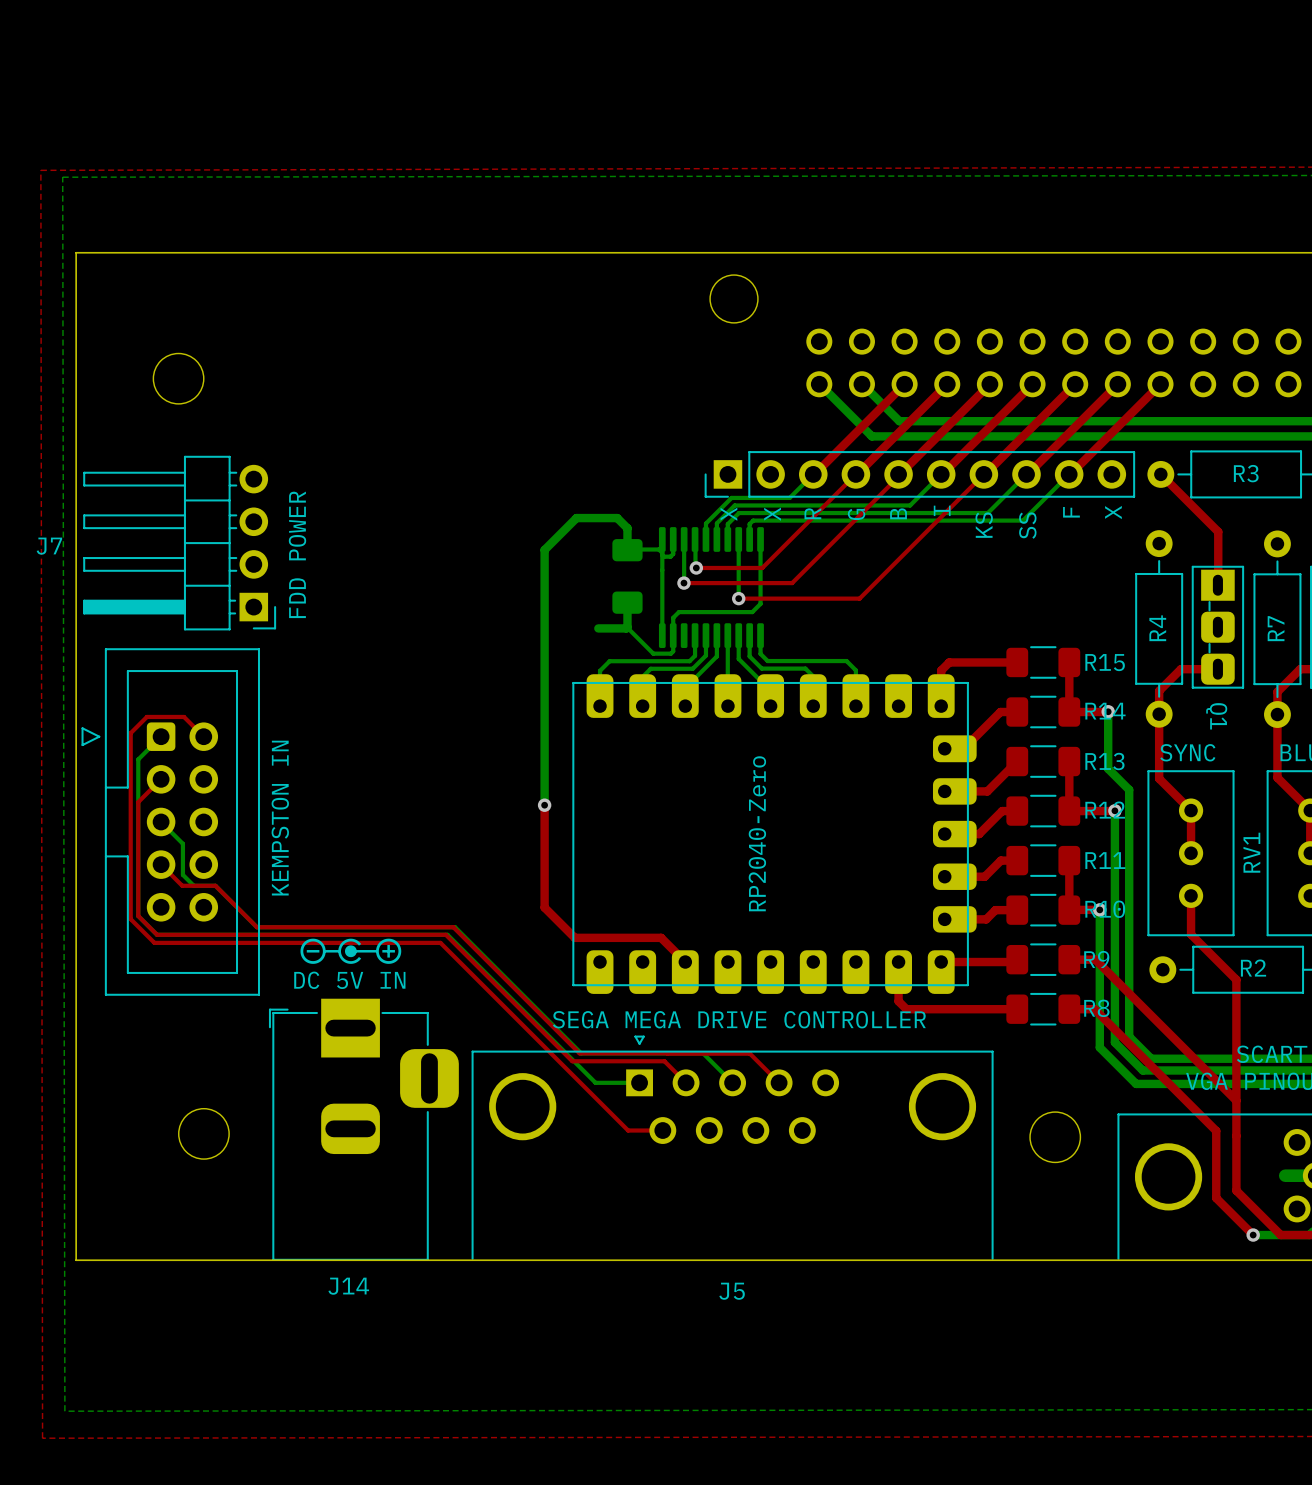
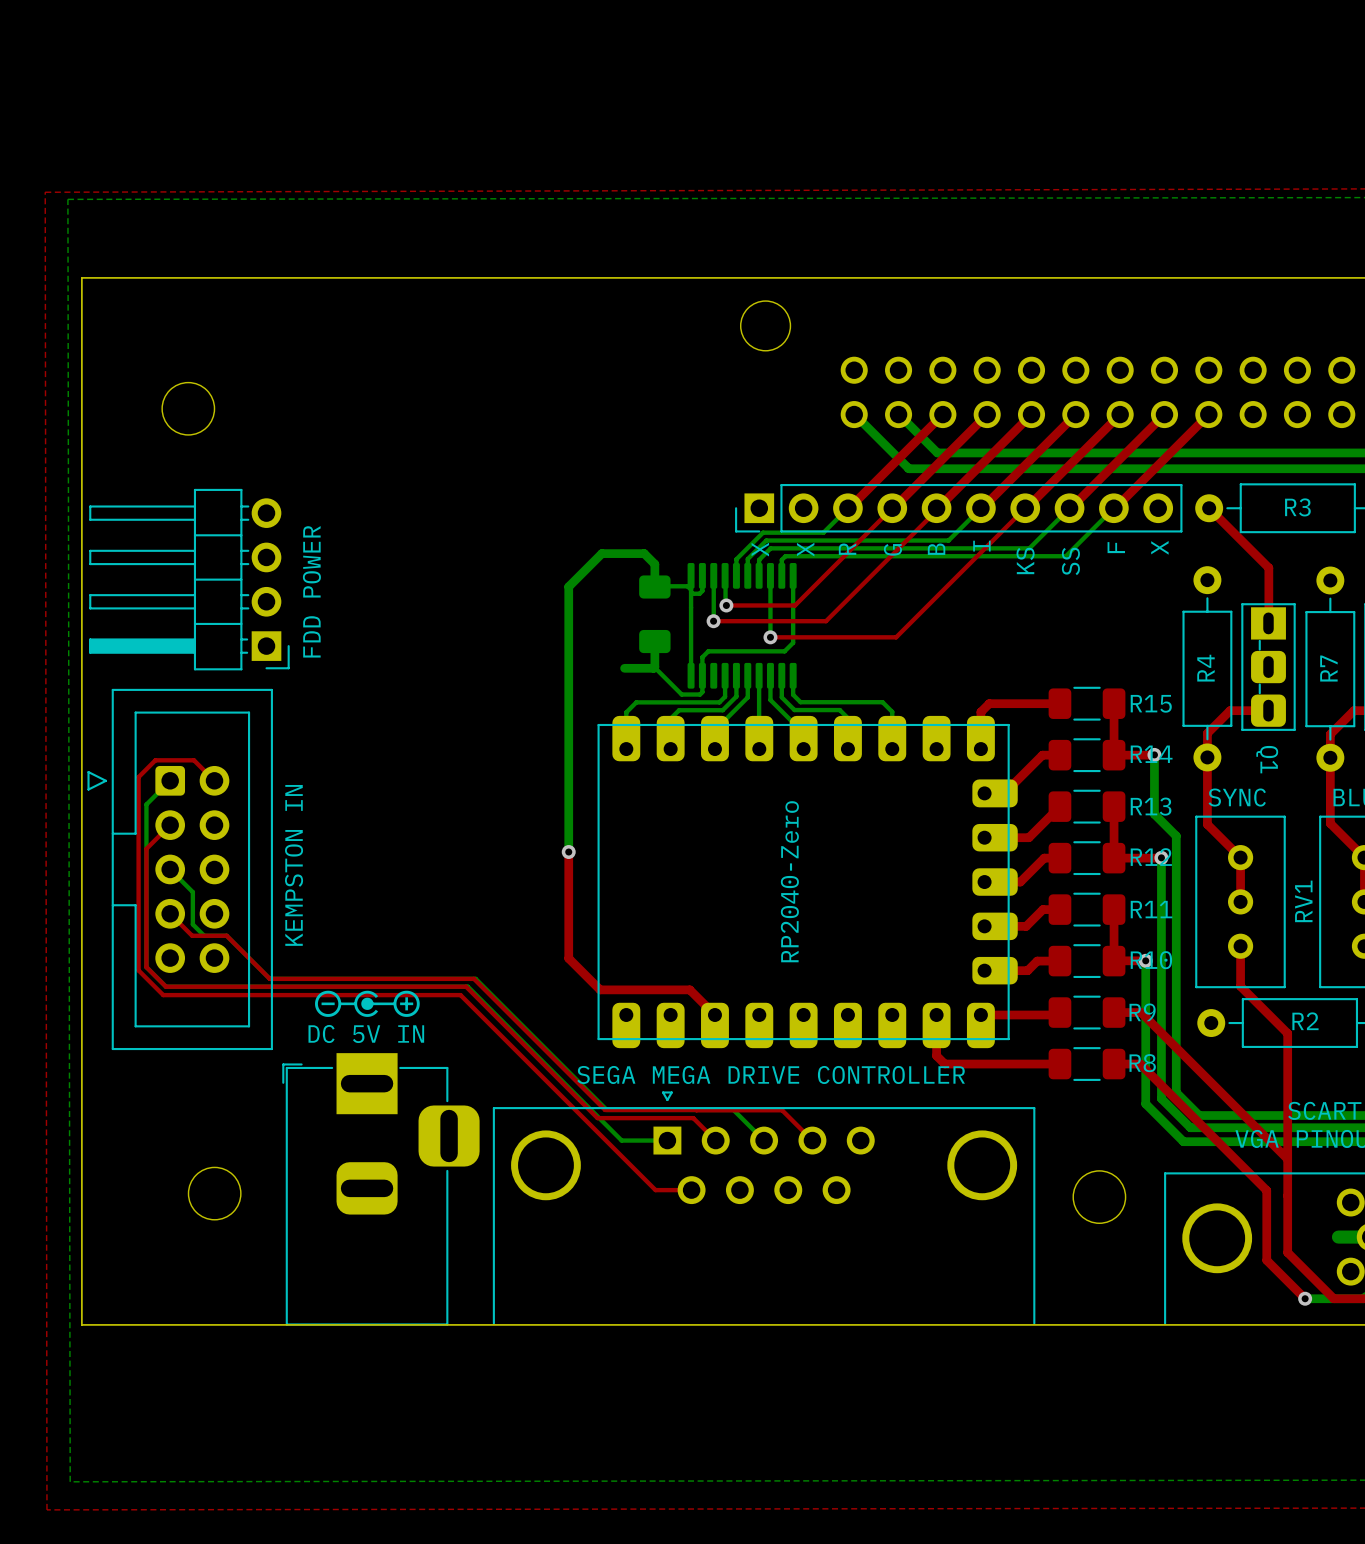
J7 name: J7 (49, 546) -> none
J14 name: J14 (348, 1286) -> none
J5 name: J5 (732, 1291) -> none

